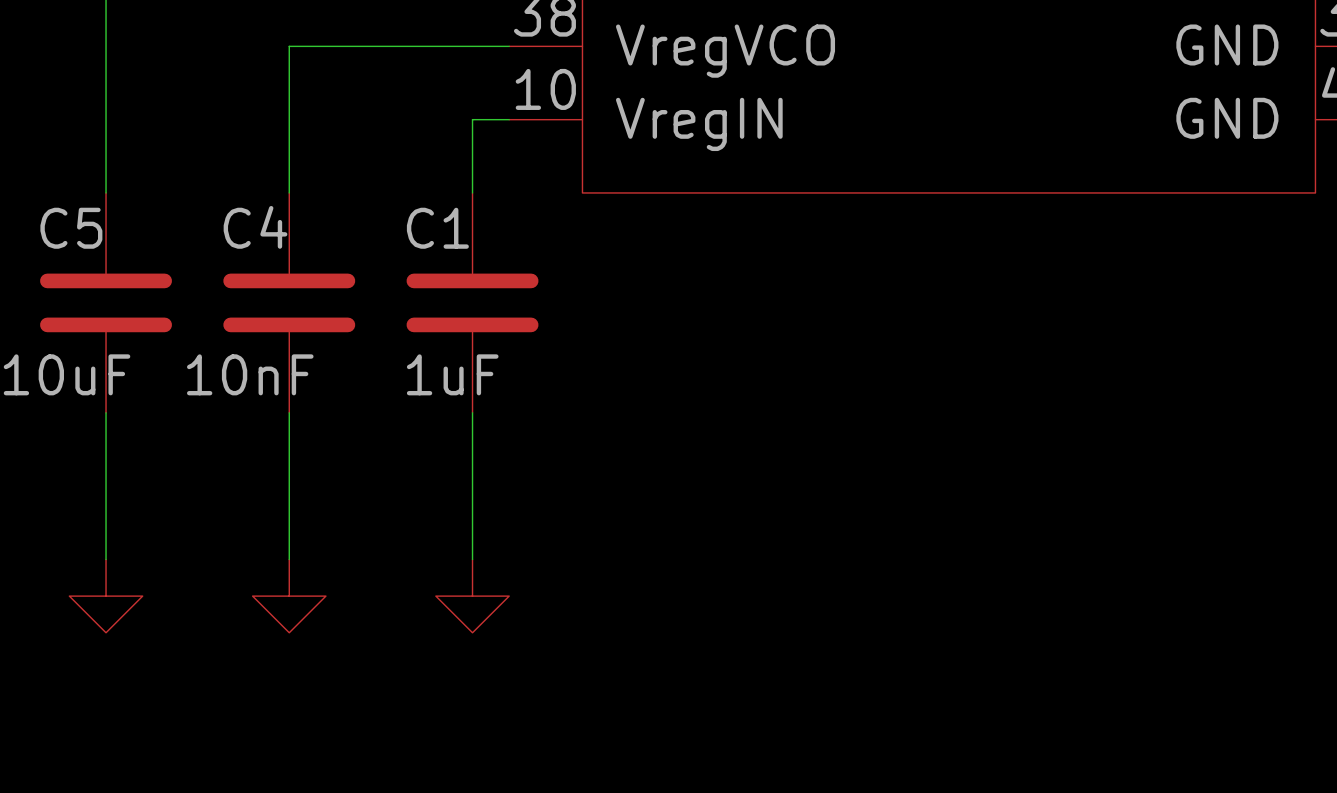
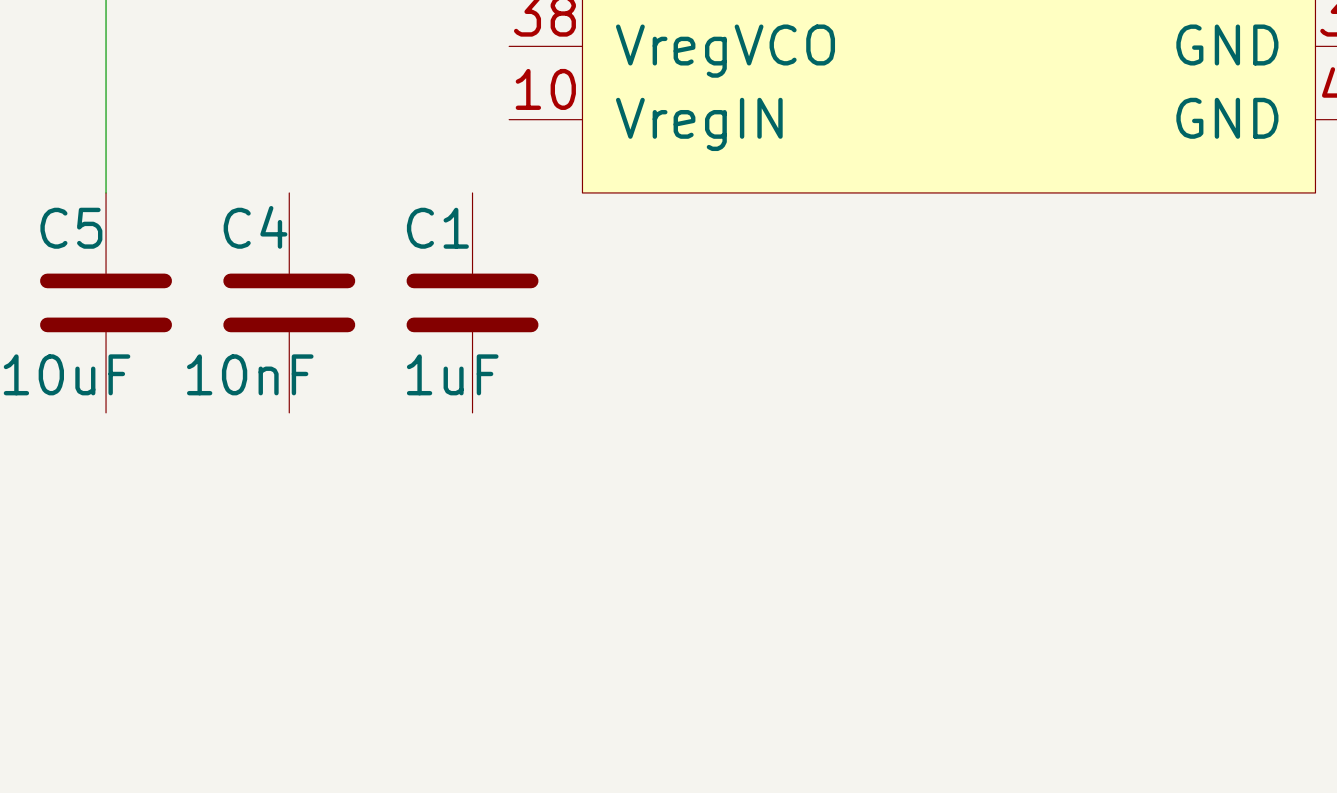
wire: (509, 46) (289, 46) (289, 192) -> none
wire: (509, 119) (472, 119) (472, 192) -> none
wire: (106, 412) (106, 559) -> none
wire: (289, 412) (289, 559) -> none
wire: (472, 412) (472, 559) -> none
power symbol: (106, 596) -> none
power symbol: (289, 596) -> none
power symbol: (472, 596) -> none

